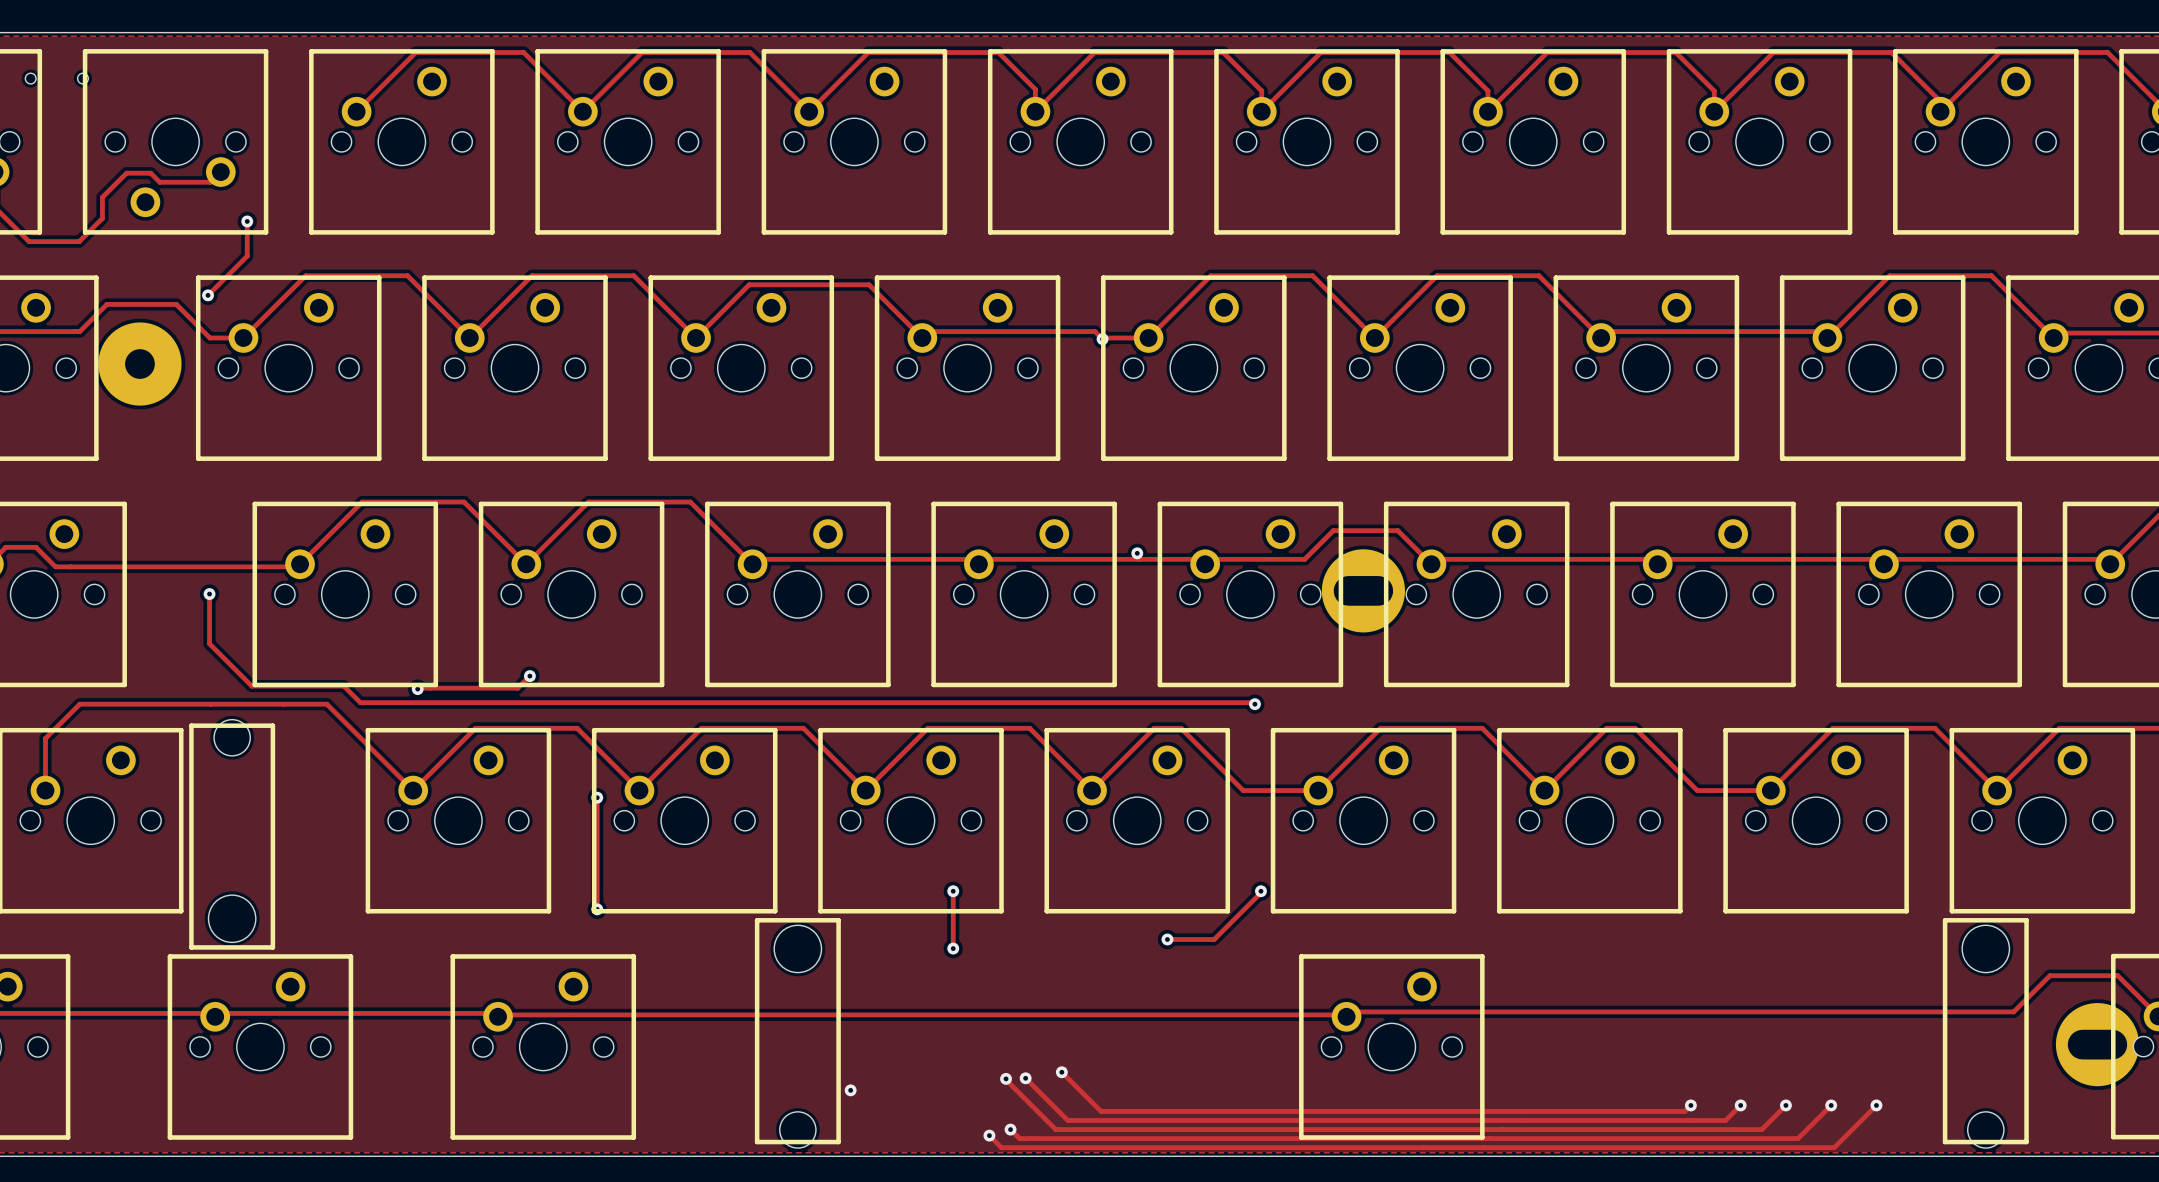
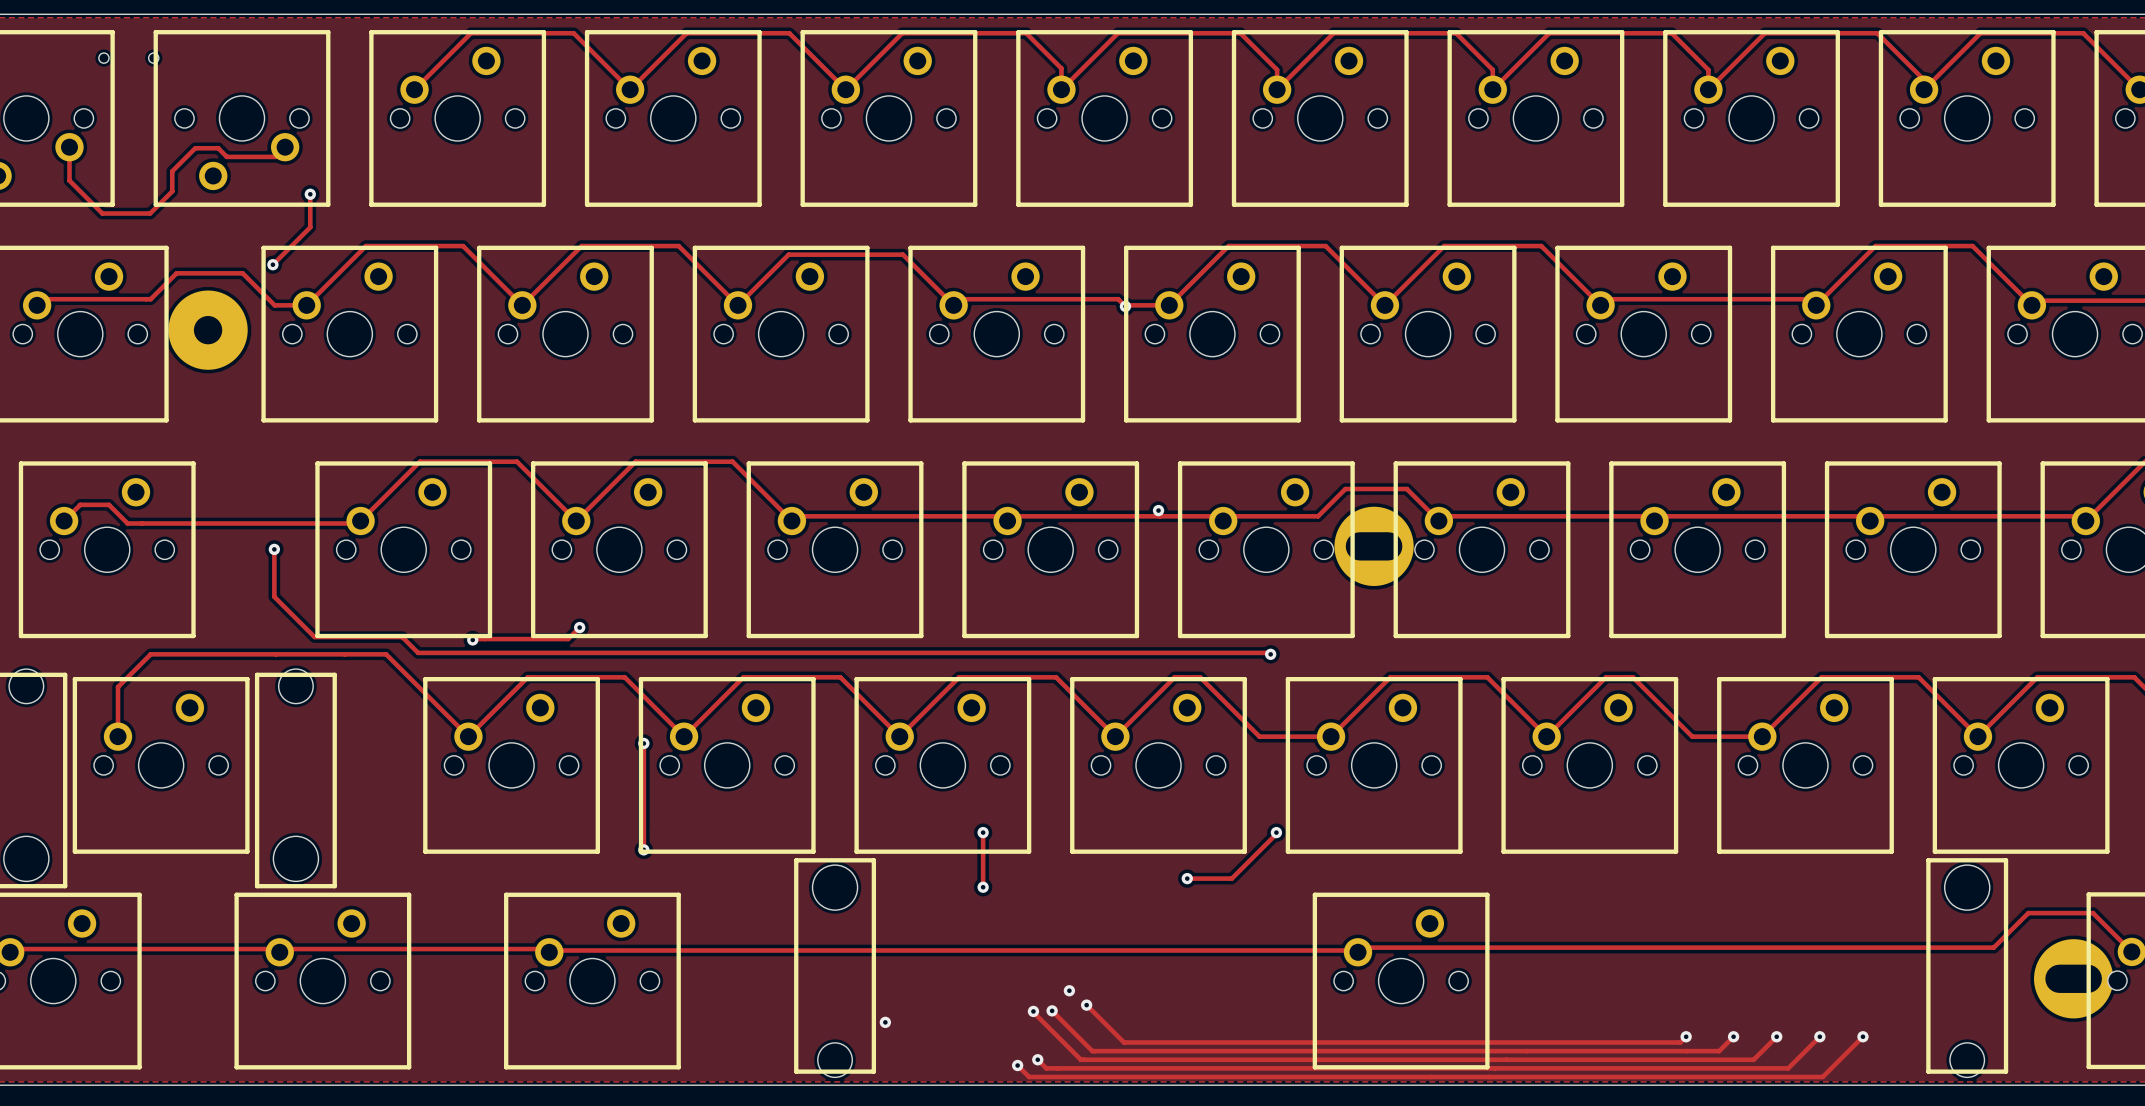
via: none -> (1069, 990)

